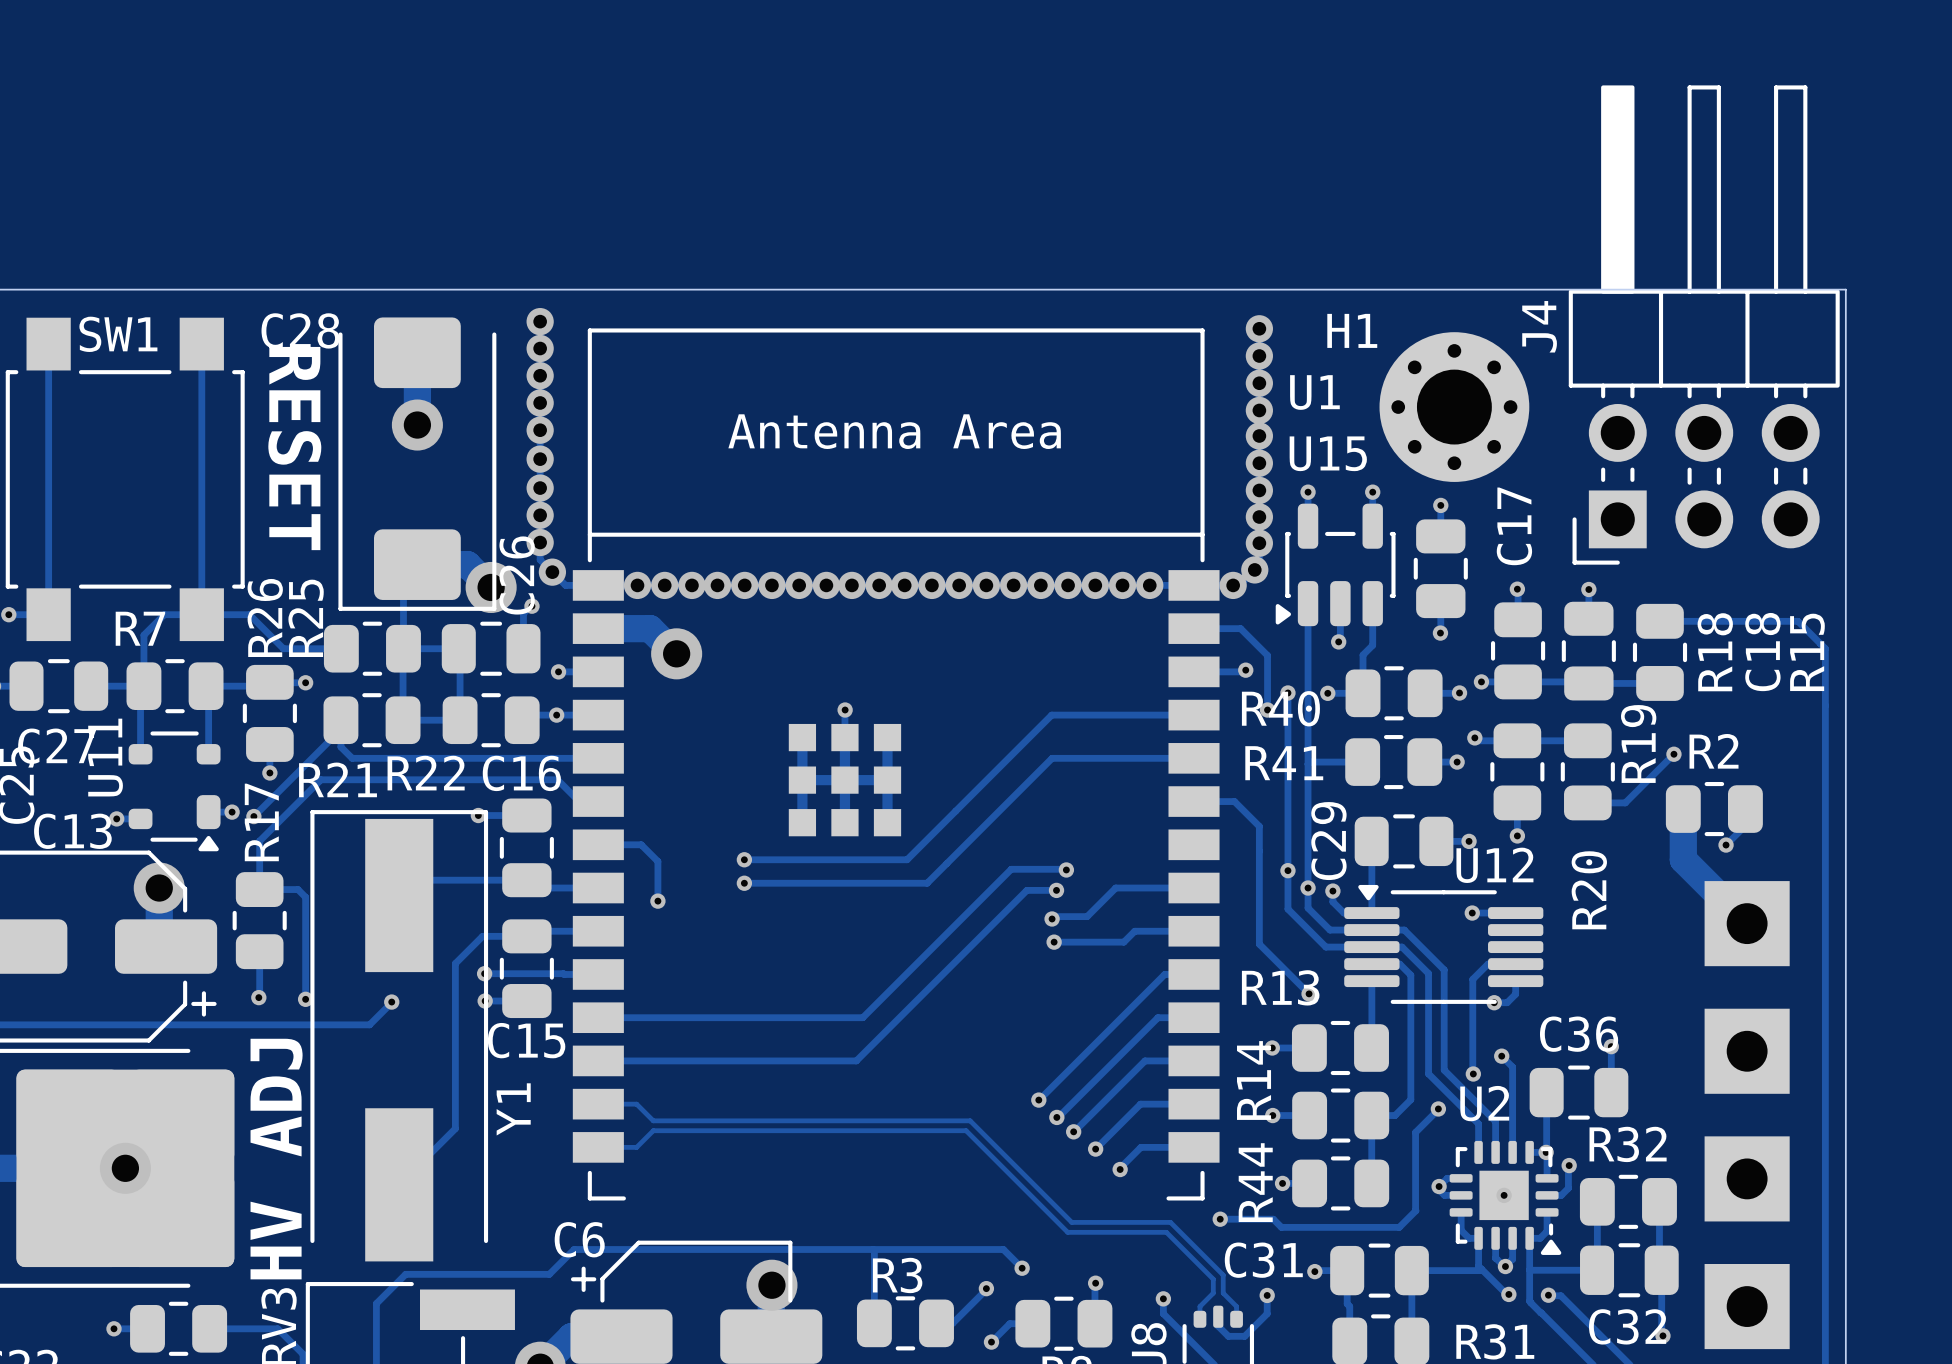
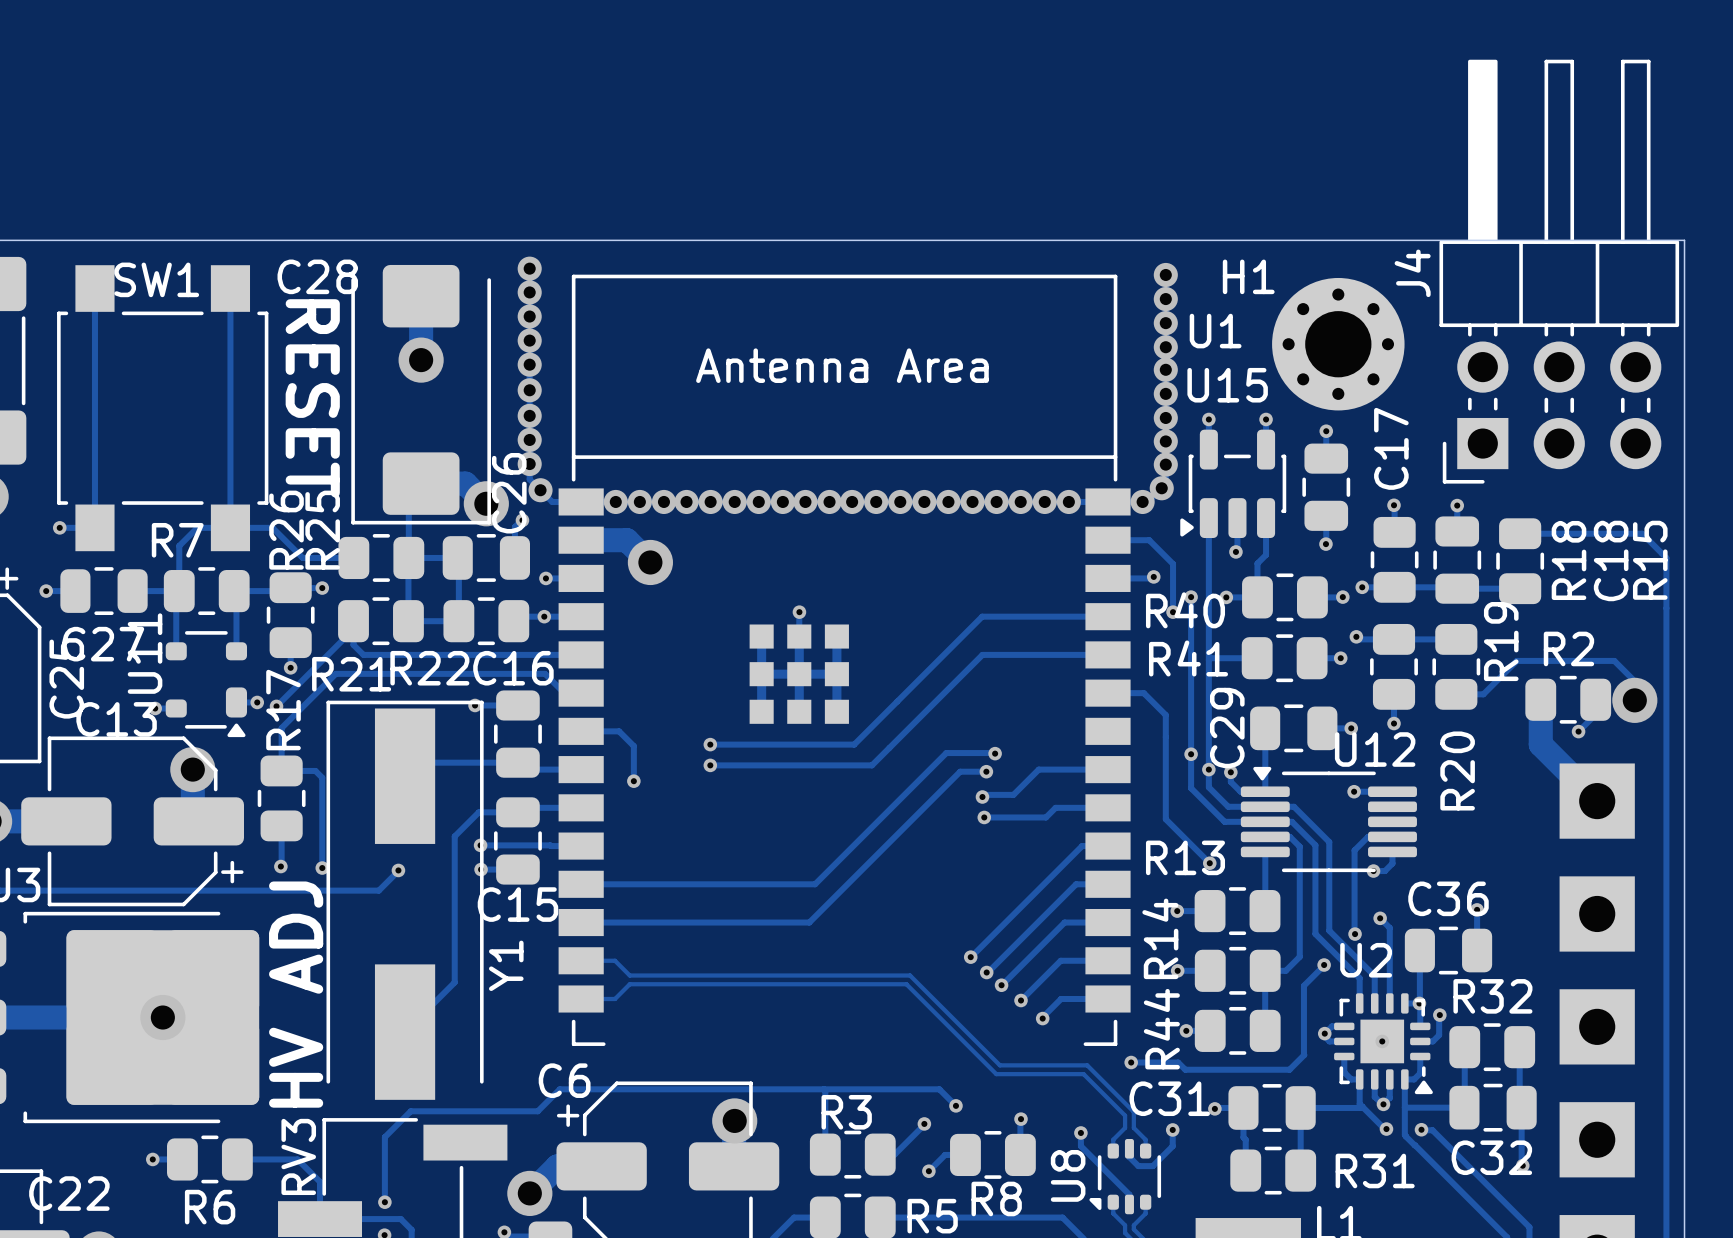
track: (1673, 754) (1625, 802) (1618, 802) -> (1634, 700) (1634, 681) (1614, 660) (1516, 660) (1483, 694)
via: (1673, 754) -> none
via: none -> (1634, 700)

